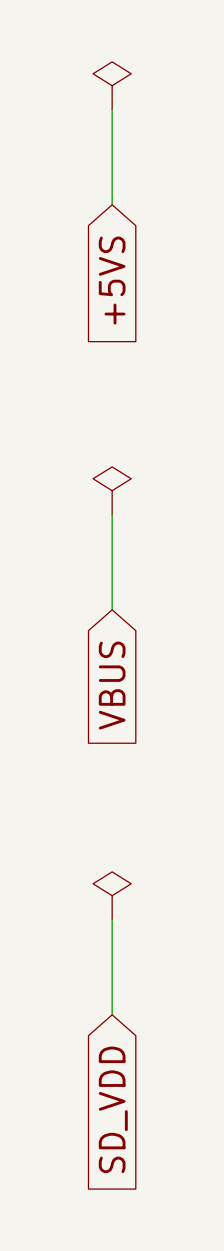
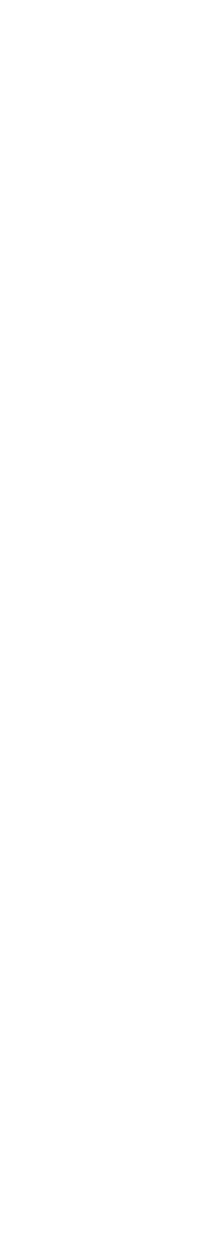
power symbol: (112, 85) -> none
wire: (112, 109) (112, 204) -> none
global label: +5VS (112, 280) -> none
power symbol: (112, 490) -> none
wire: (112, 514) (112, 609) -> none
global label: VBUS (112, 685) -> none
power symbol: (112, 895) -> none
wire: (112, 919) (112, 1014) -> none
global label: SD_VDD (113, 1109) -> none

